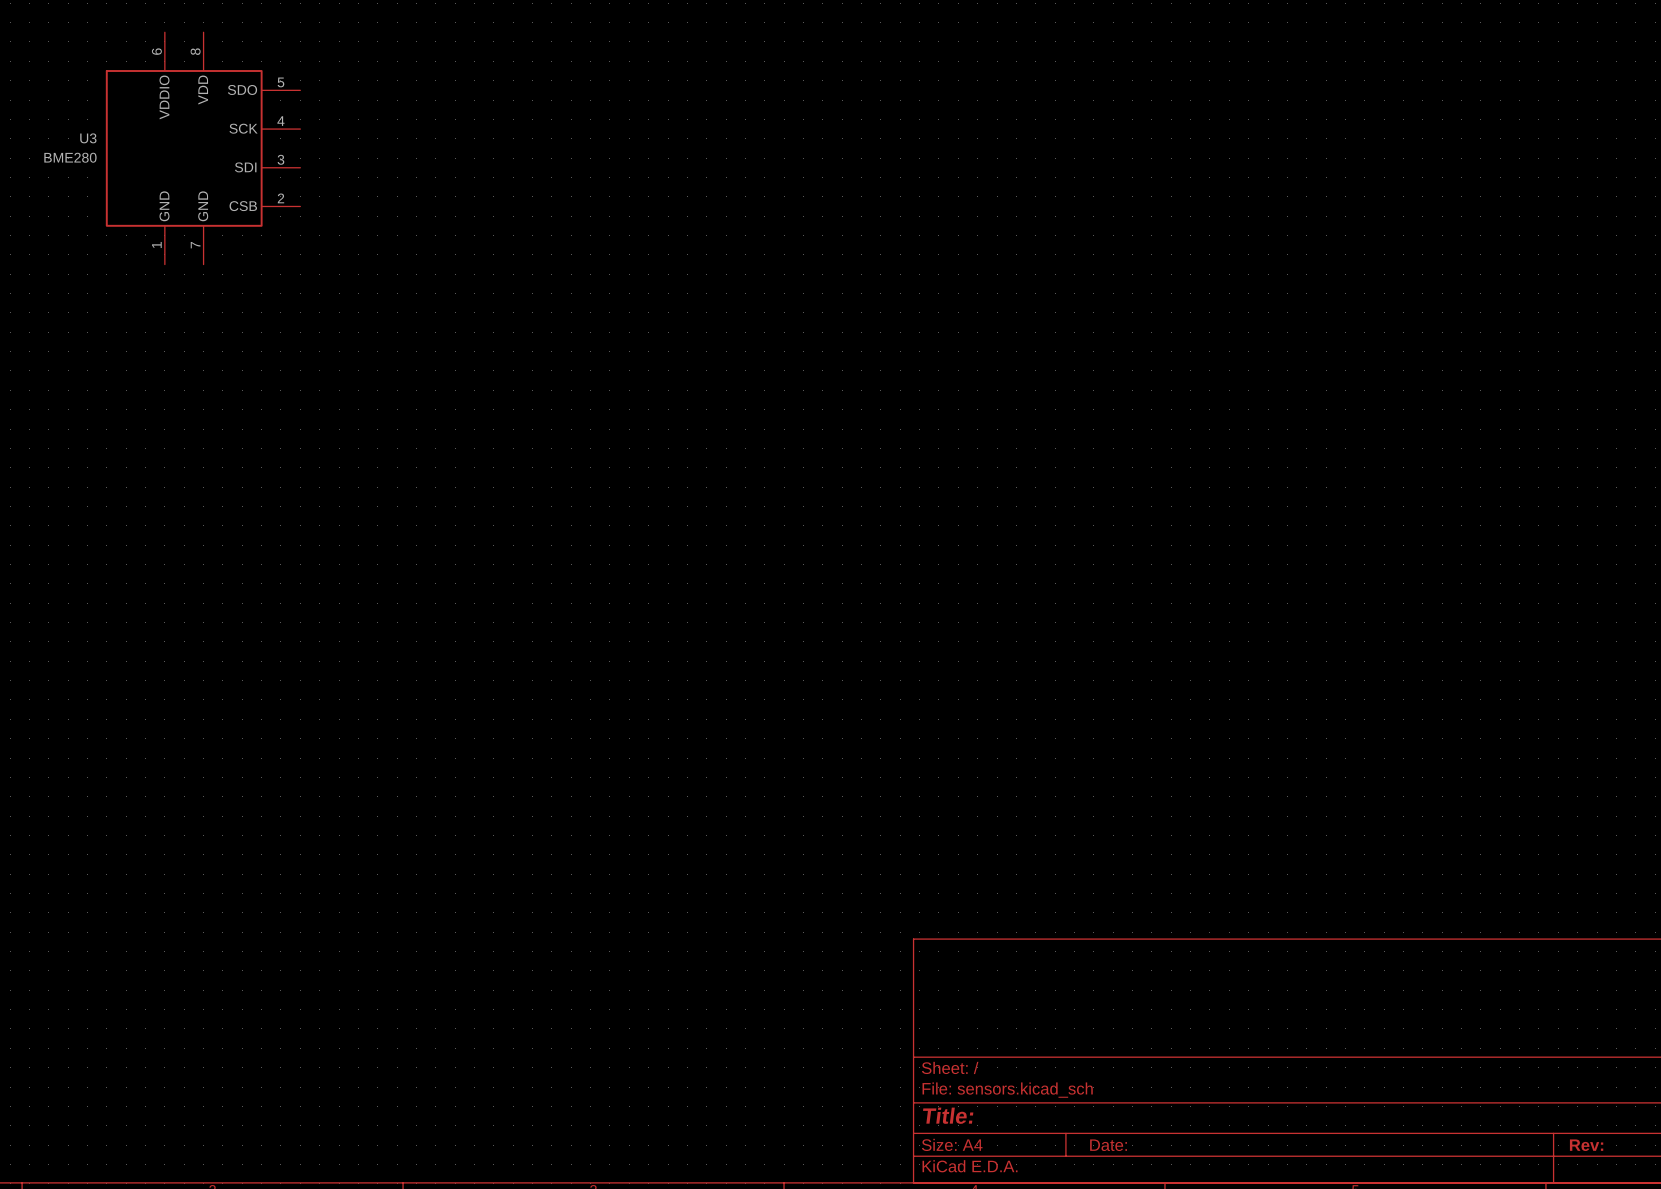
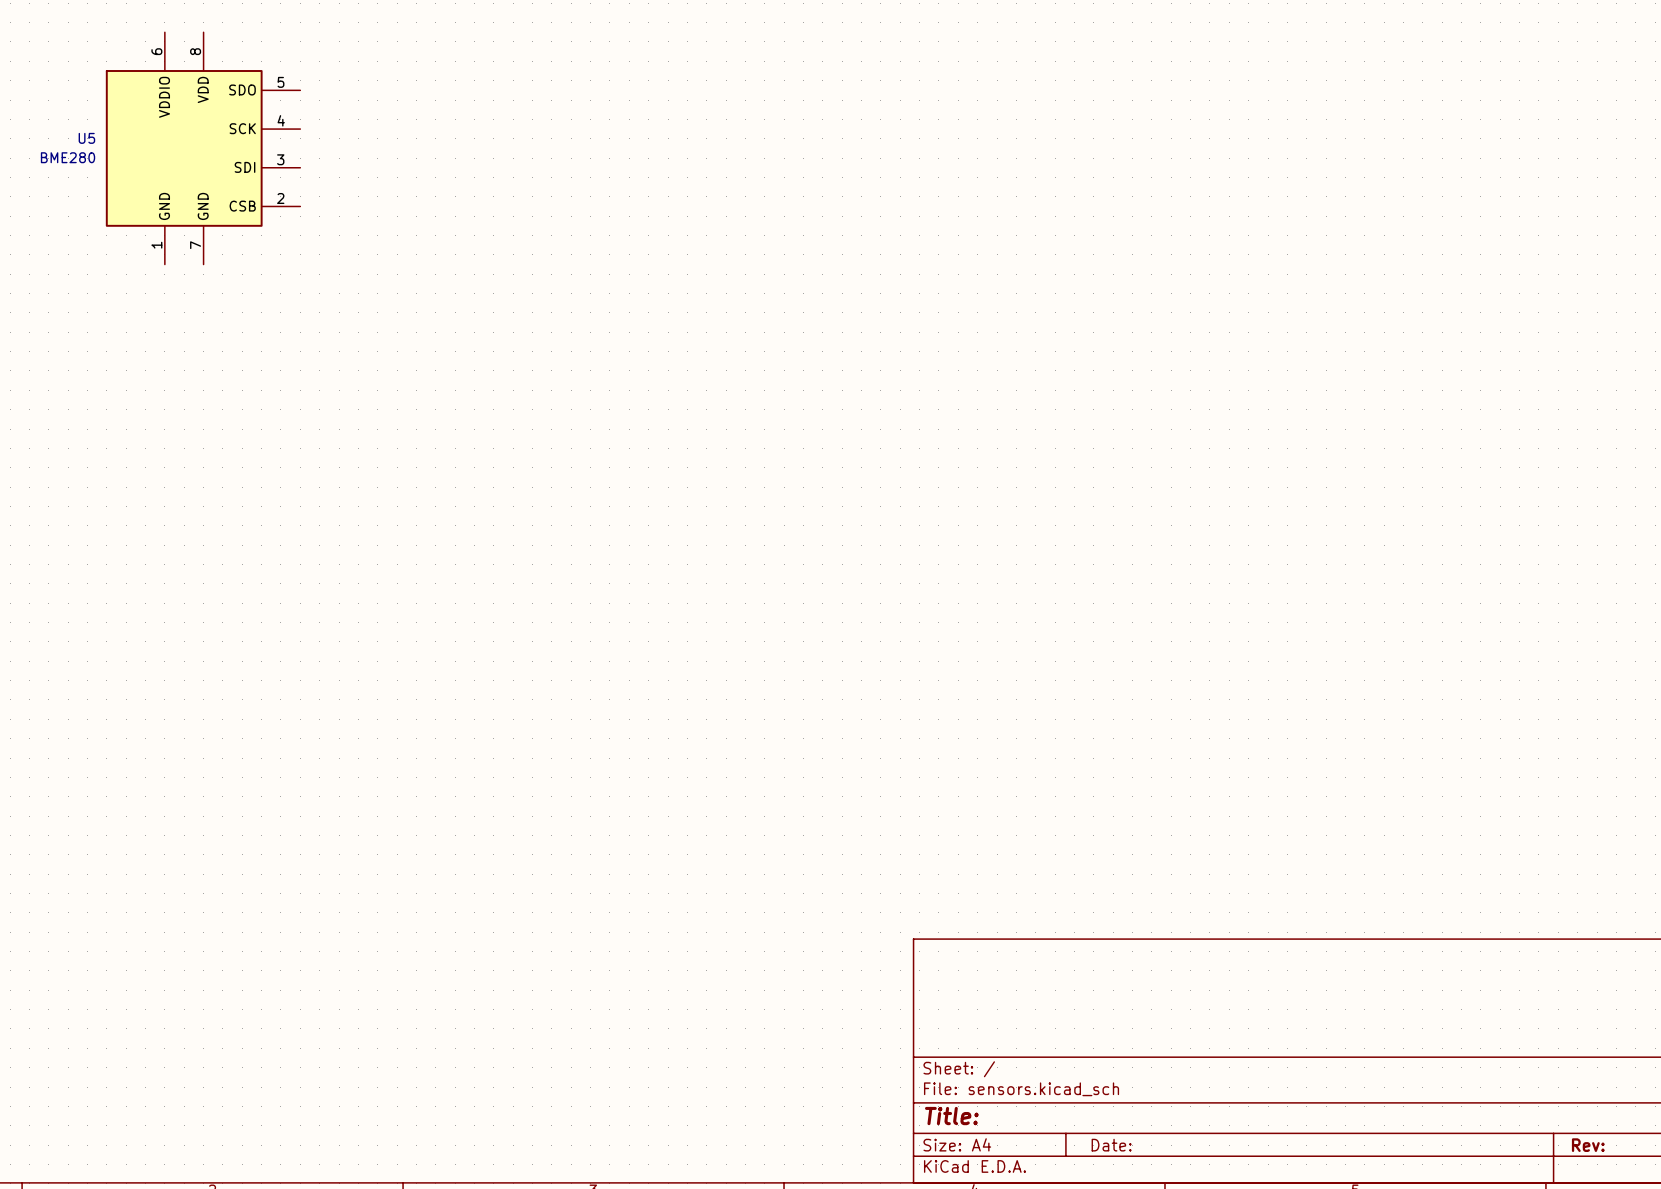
U3 name: U3 (88, 138) -> U5 (86, 138)

